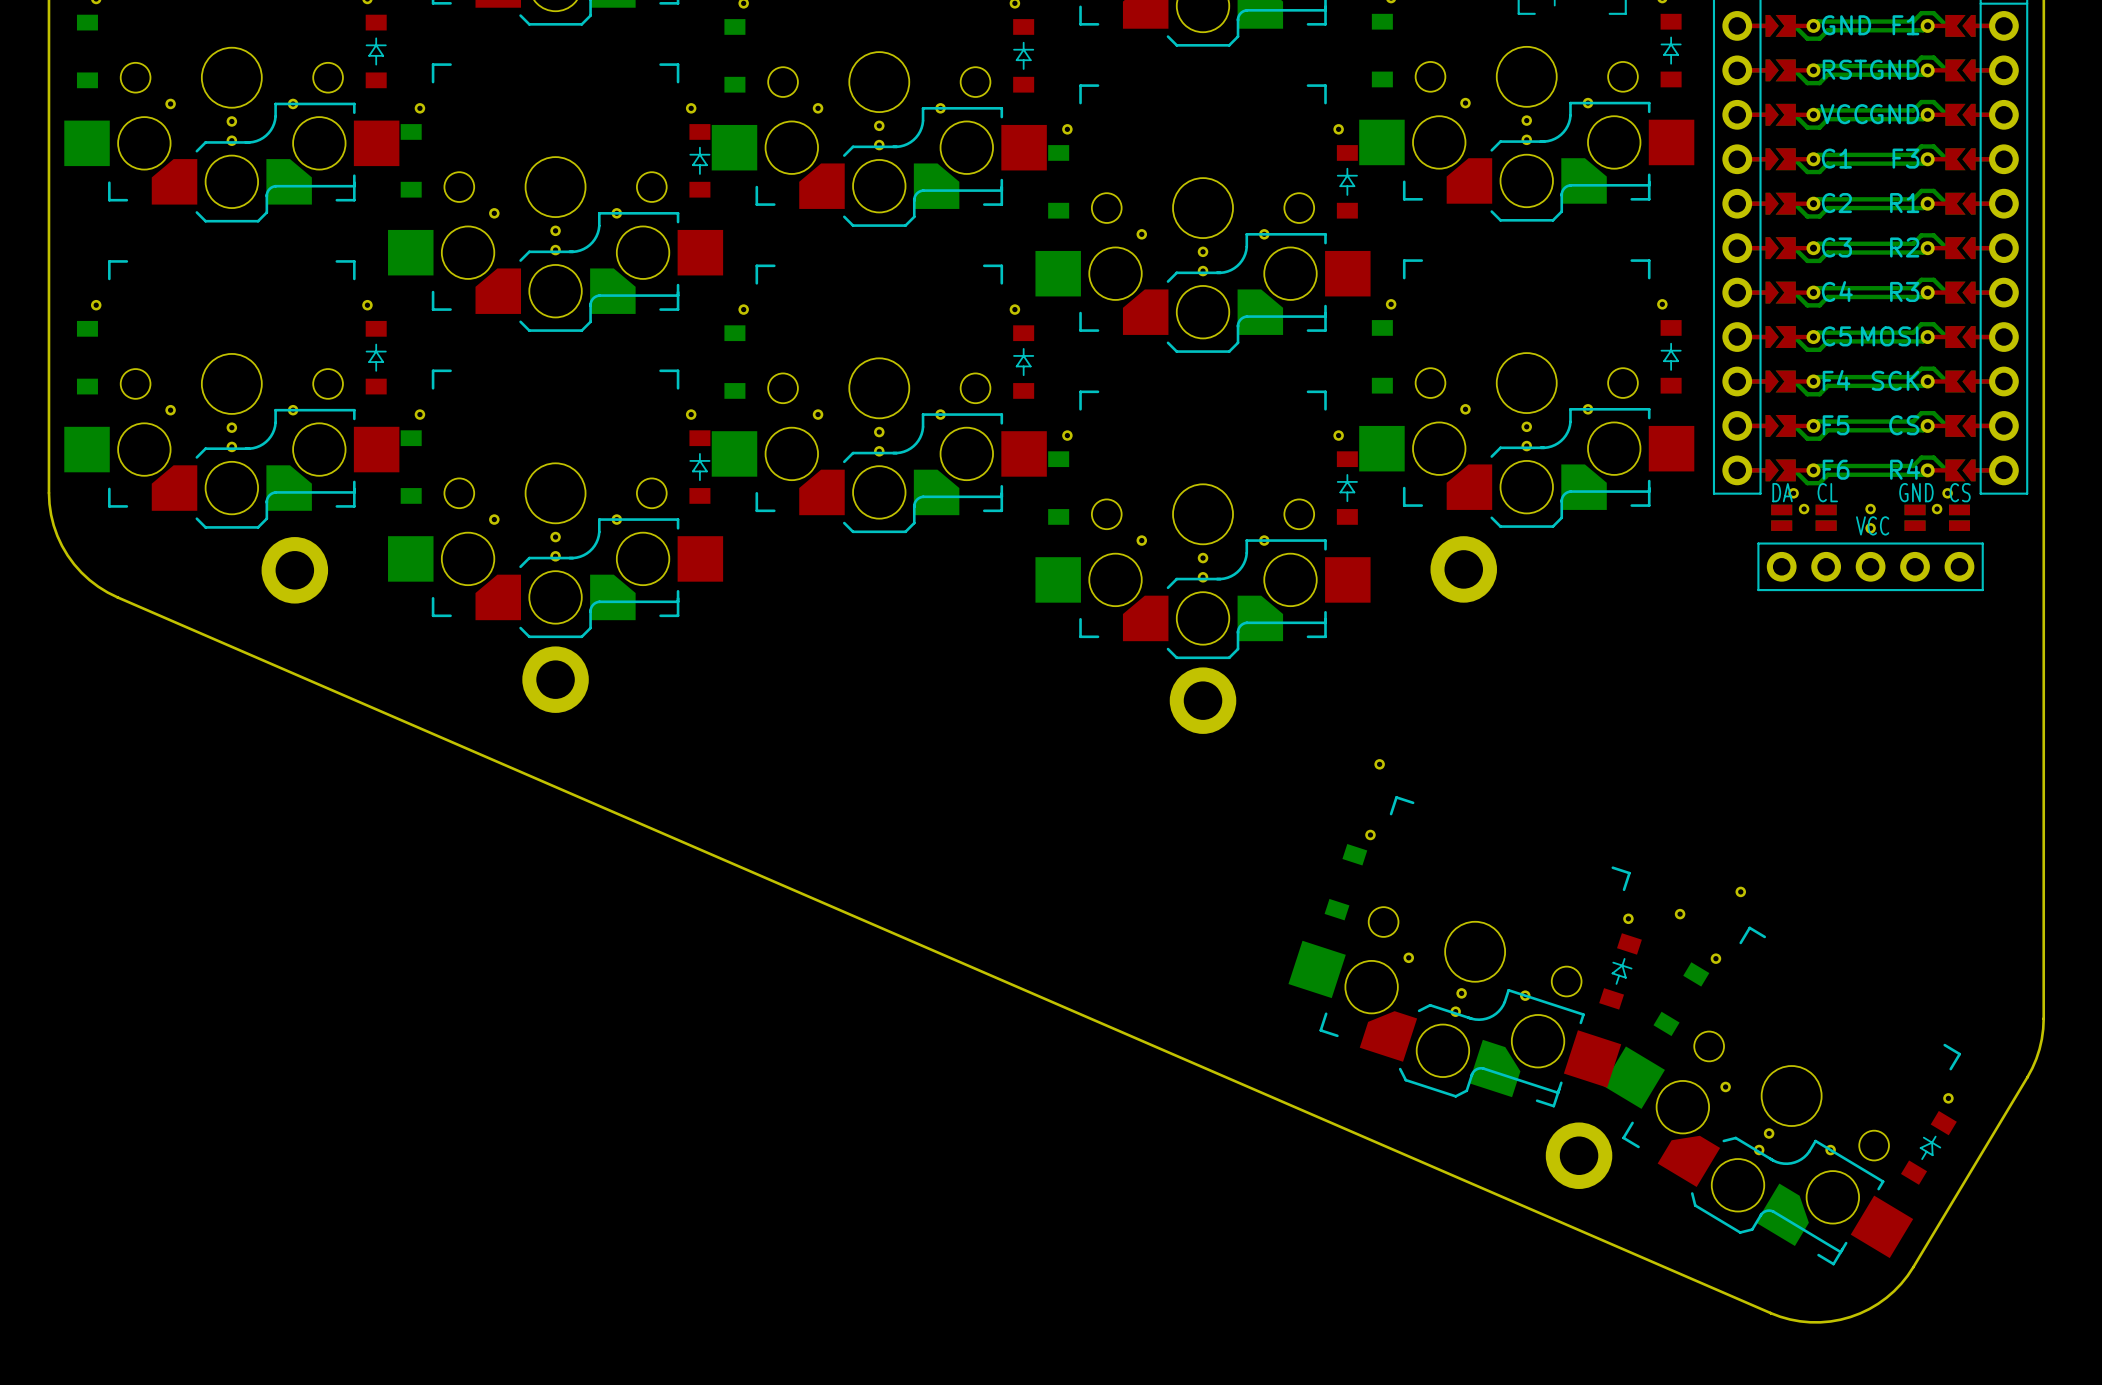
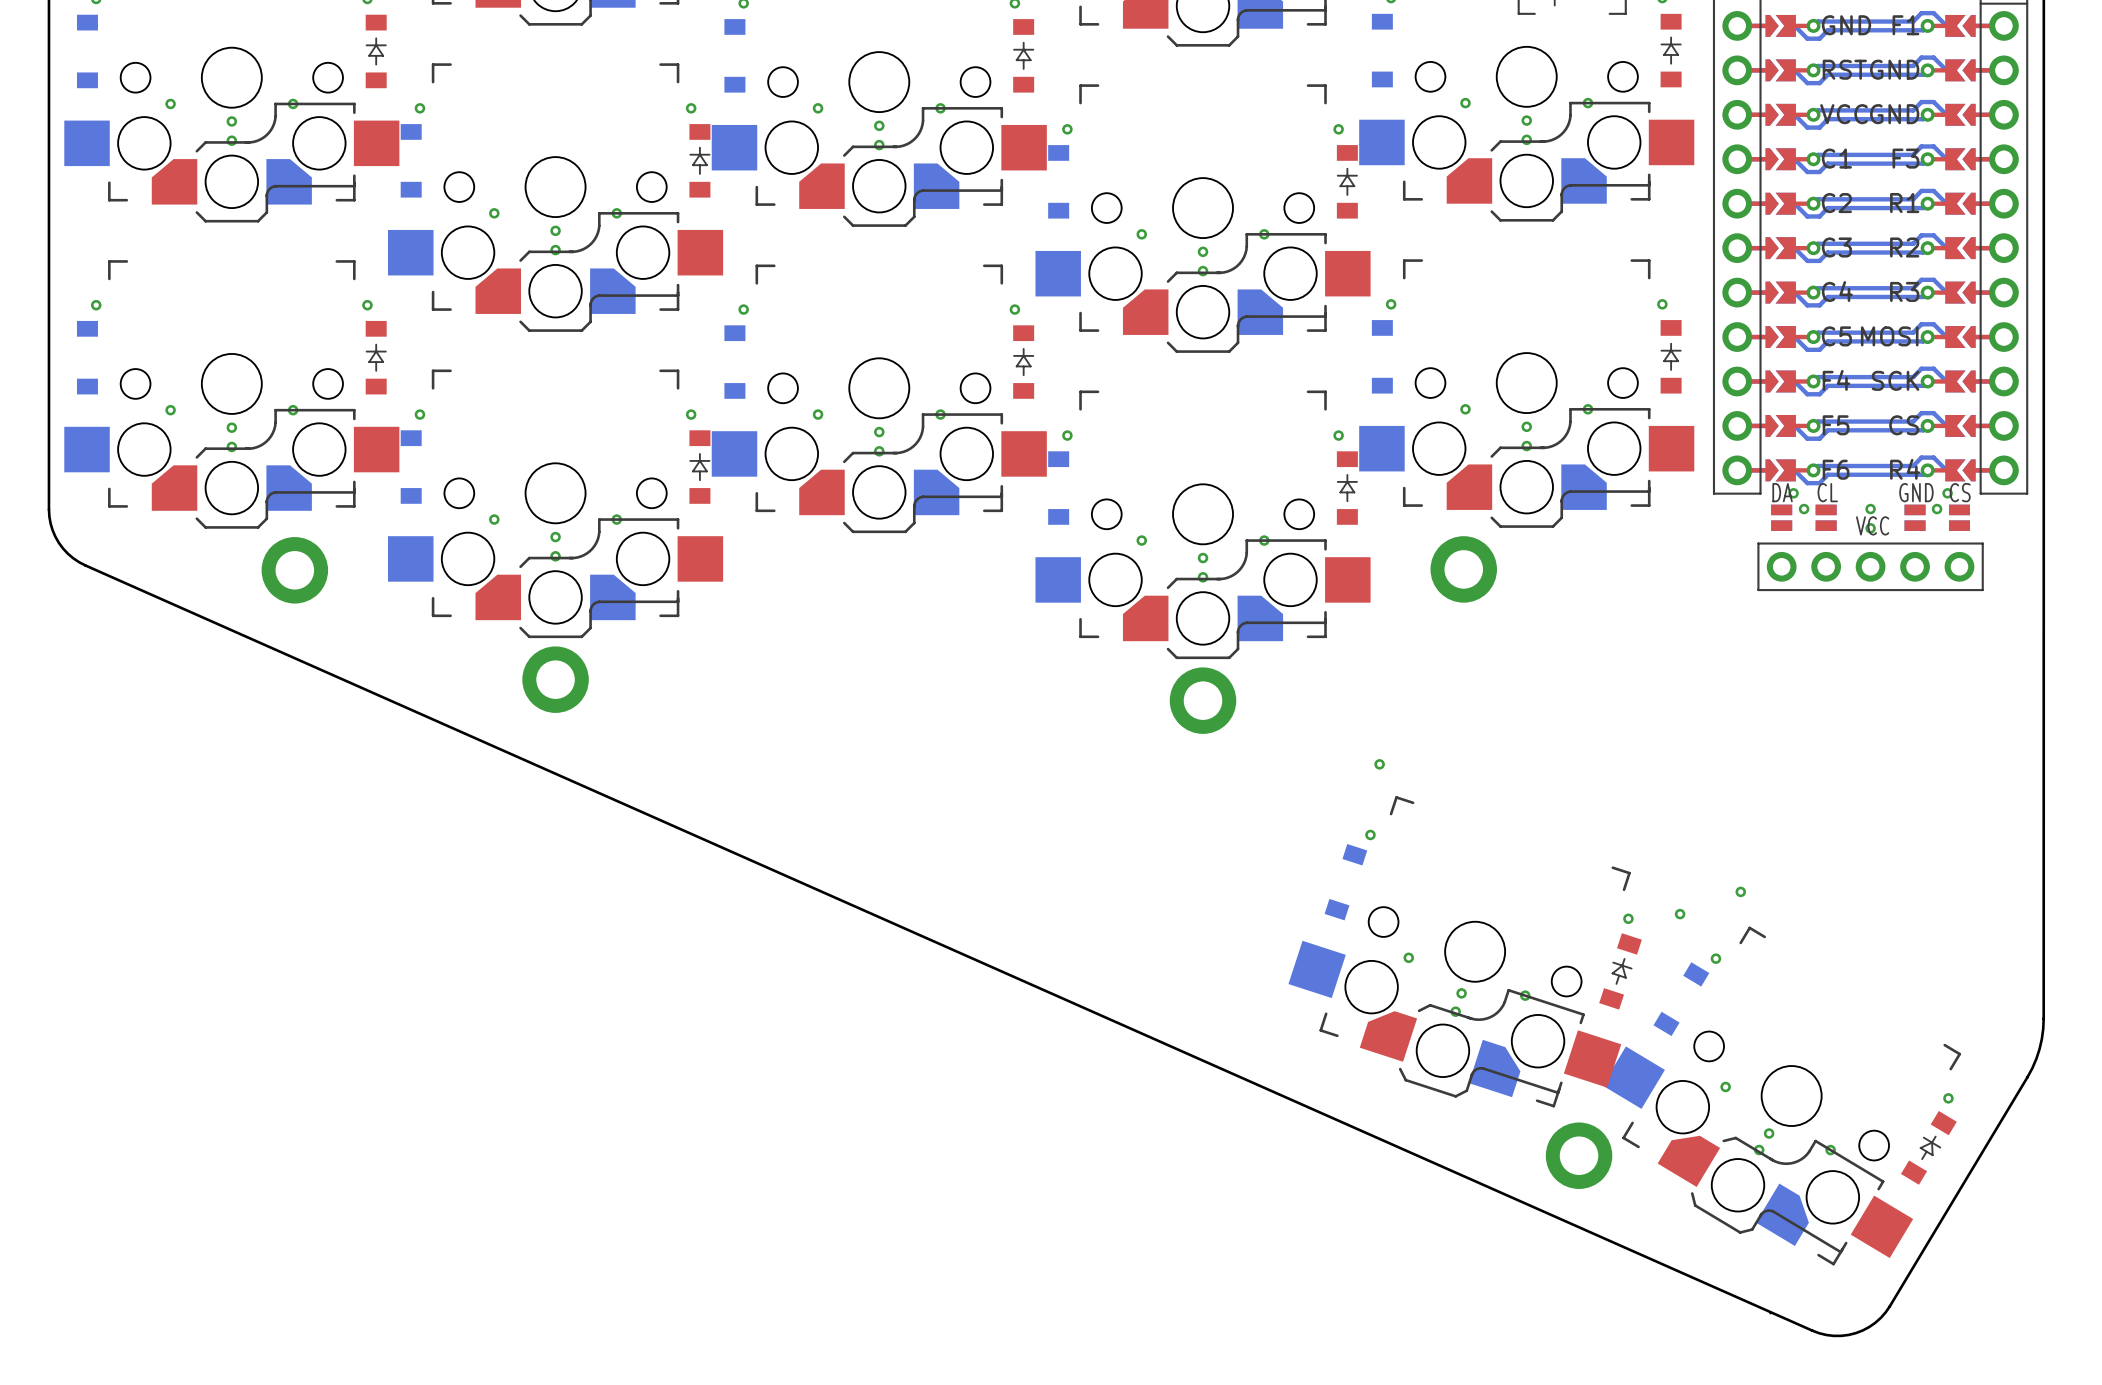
board edge: (48, 492) (53, 525) (67, 555) (89, 580) (117, 597) (1770, 1313) (1790, 1319) (1810, 1322) (1830, 1321) (1850, 1316) (1869, 1309) (1886, 1297) (1901, 1283) (1913, 1267) -> (48, 492) (49, 516) (55, 536) (67, 553) (85, 565) (1812, 1330) (1826, 1335) (1841, 1335) (1855, 1333) (1869, 1327) (1885, 1312) (1913, 1267)

